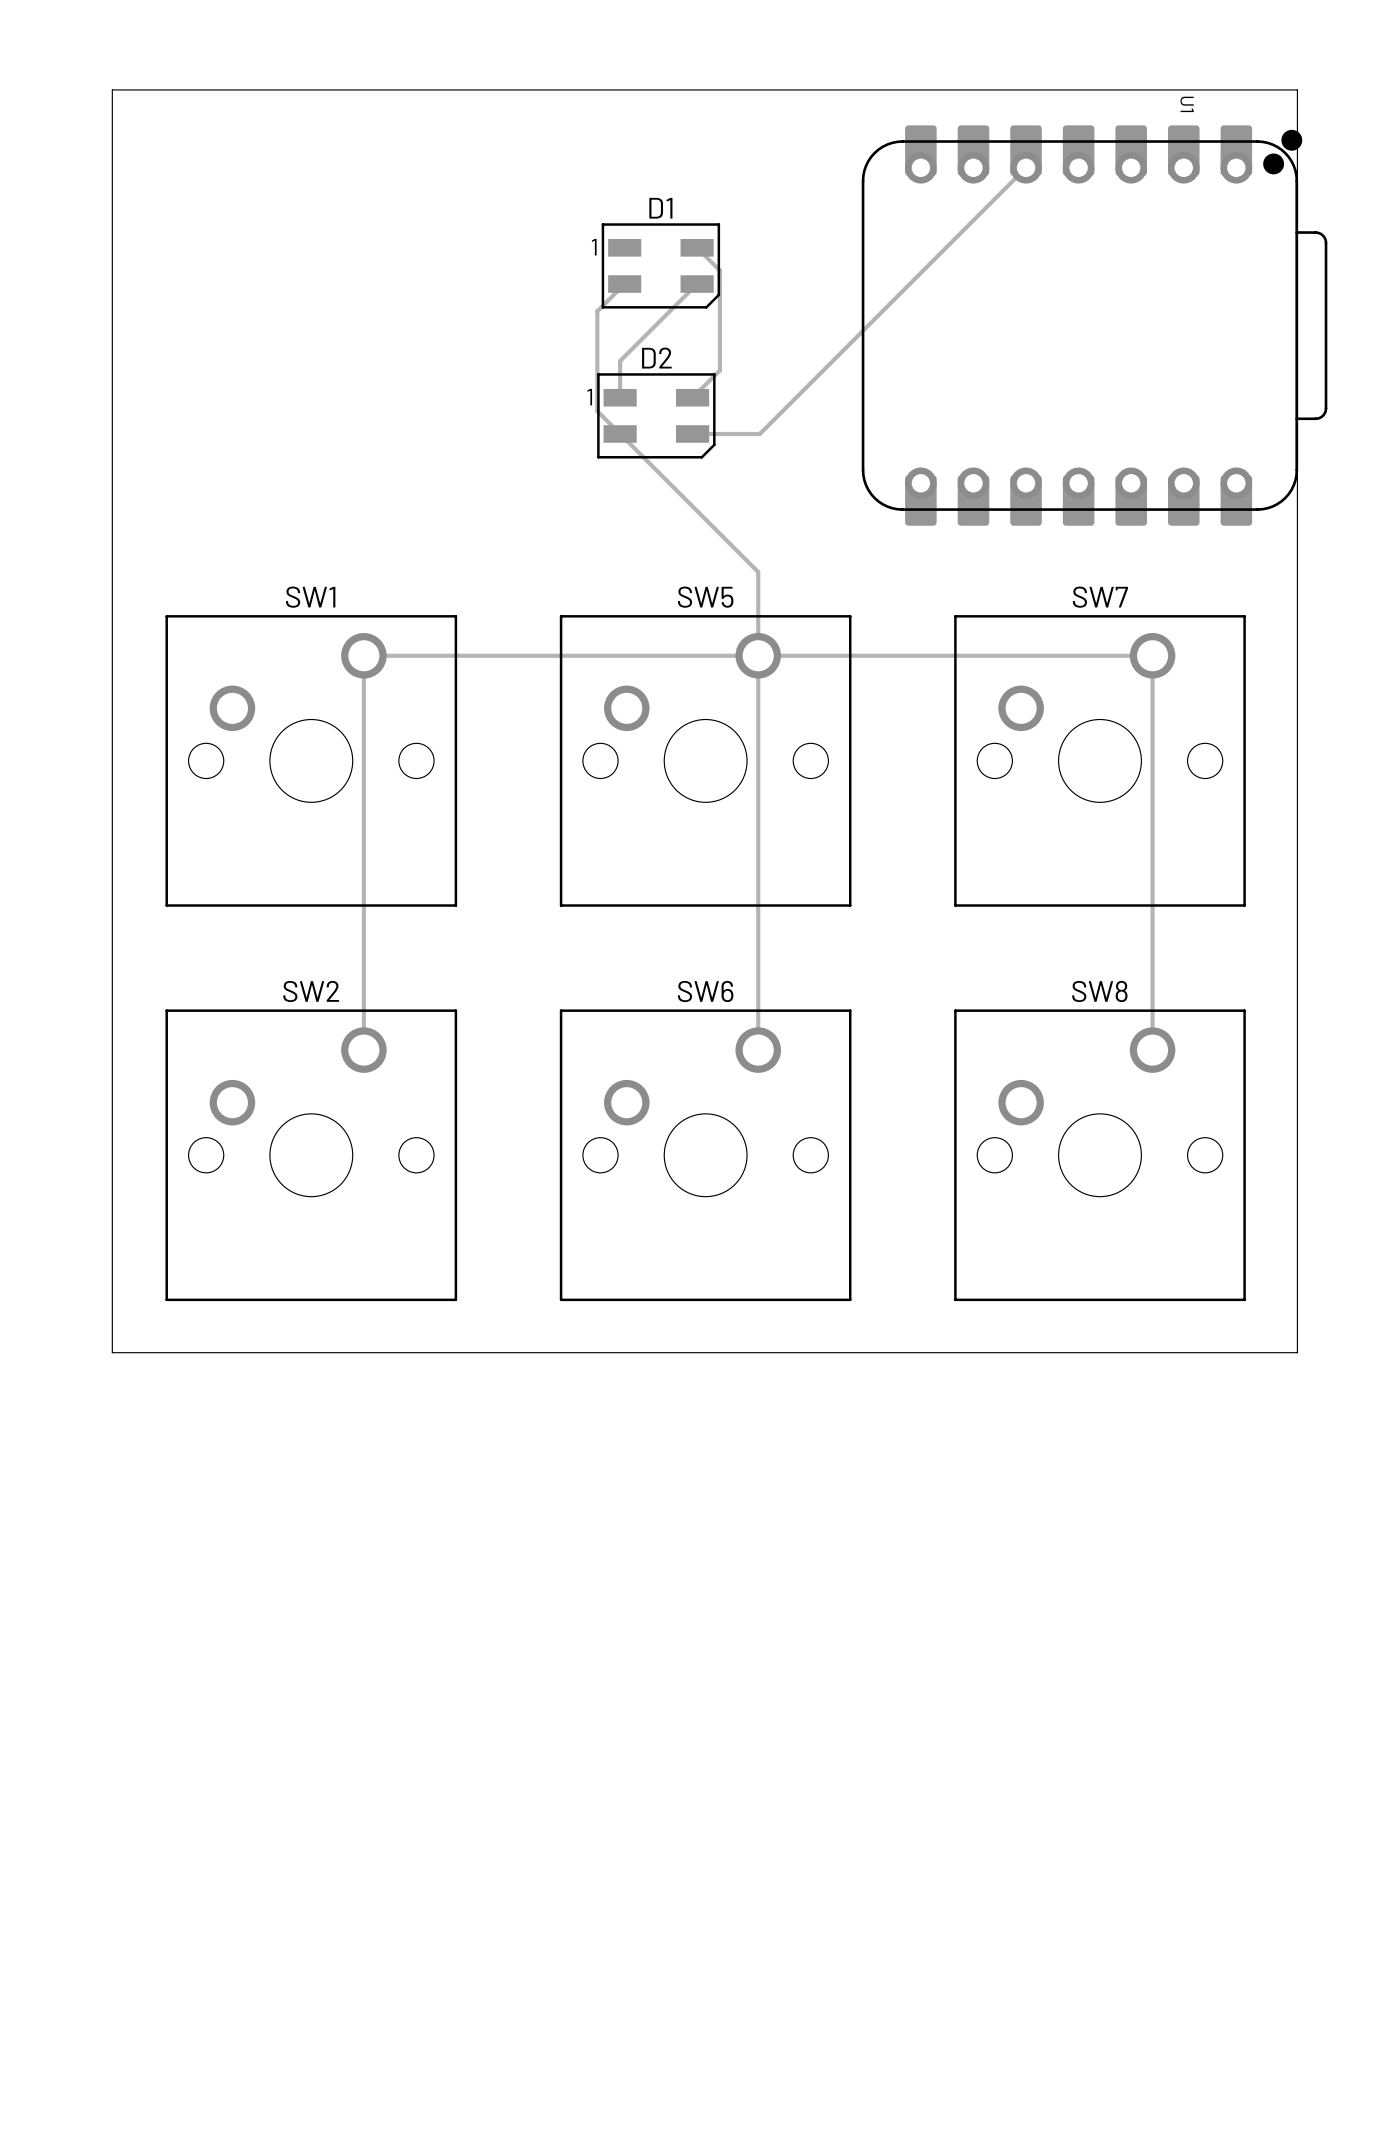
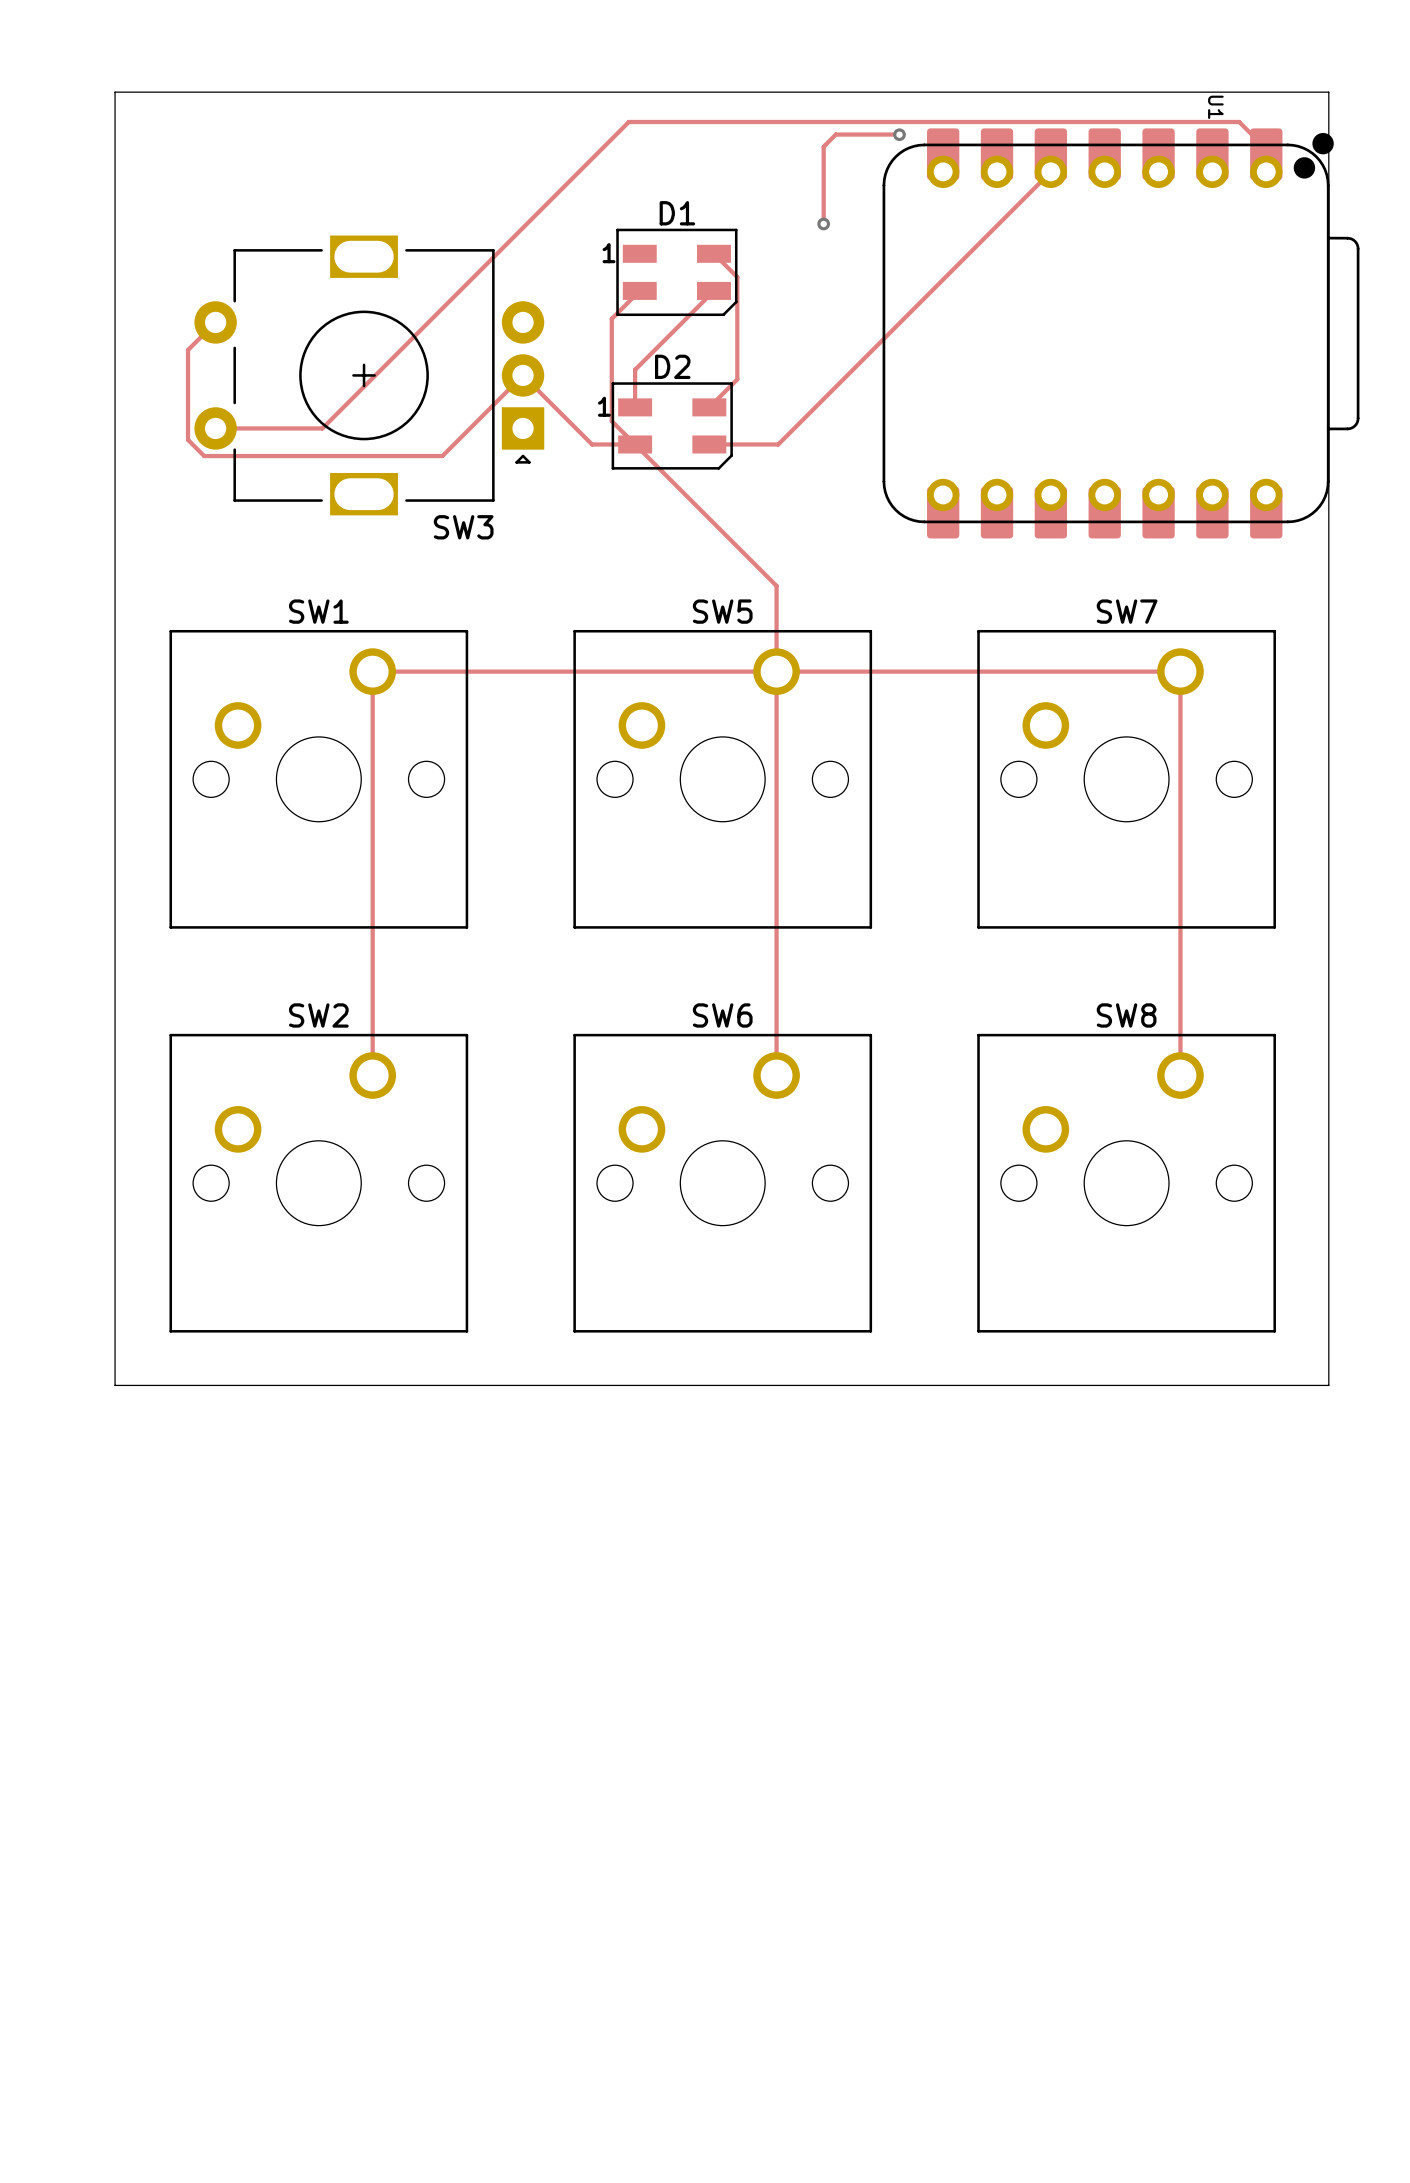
track: none -> (899, 134) (835, 134) (823, 146) (823, 223)
via: none -> (899, 134)
track: none -> (1266, 171) (1266, 149) (1239, 122) (628, 122) (322, 428) (215, 428)
via: none -> (823, 223)
track: none -> (215, 322) (188, 350) (188, 439) (204, 456) (442, 456) (523, 375) (592, 444) (635, 444)
SW3: none -> (369, 375)

